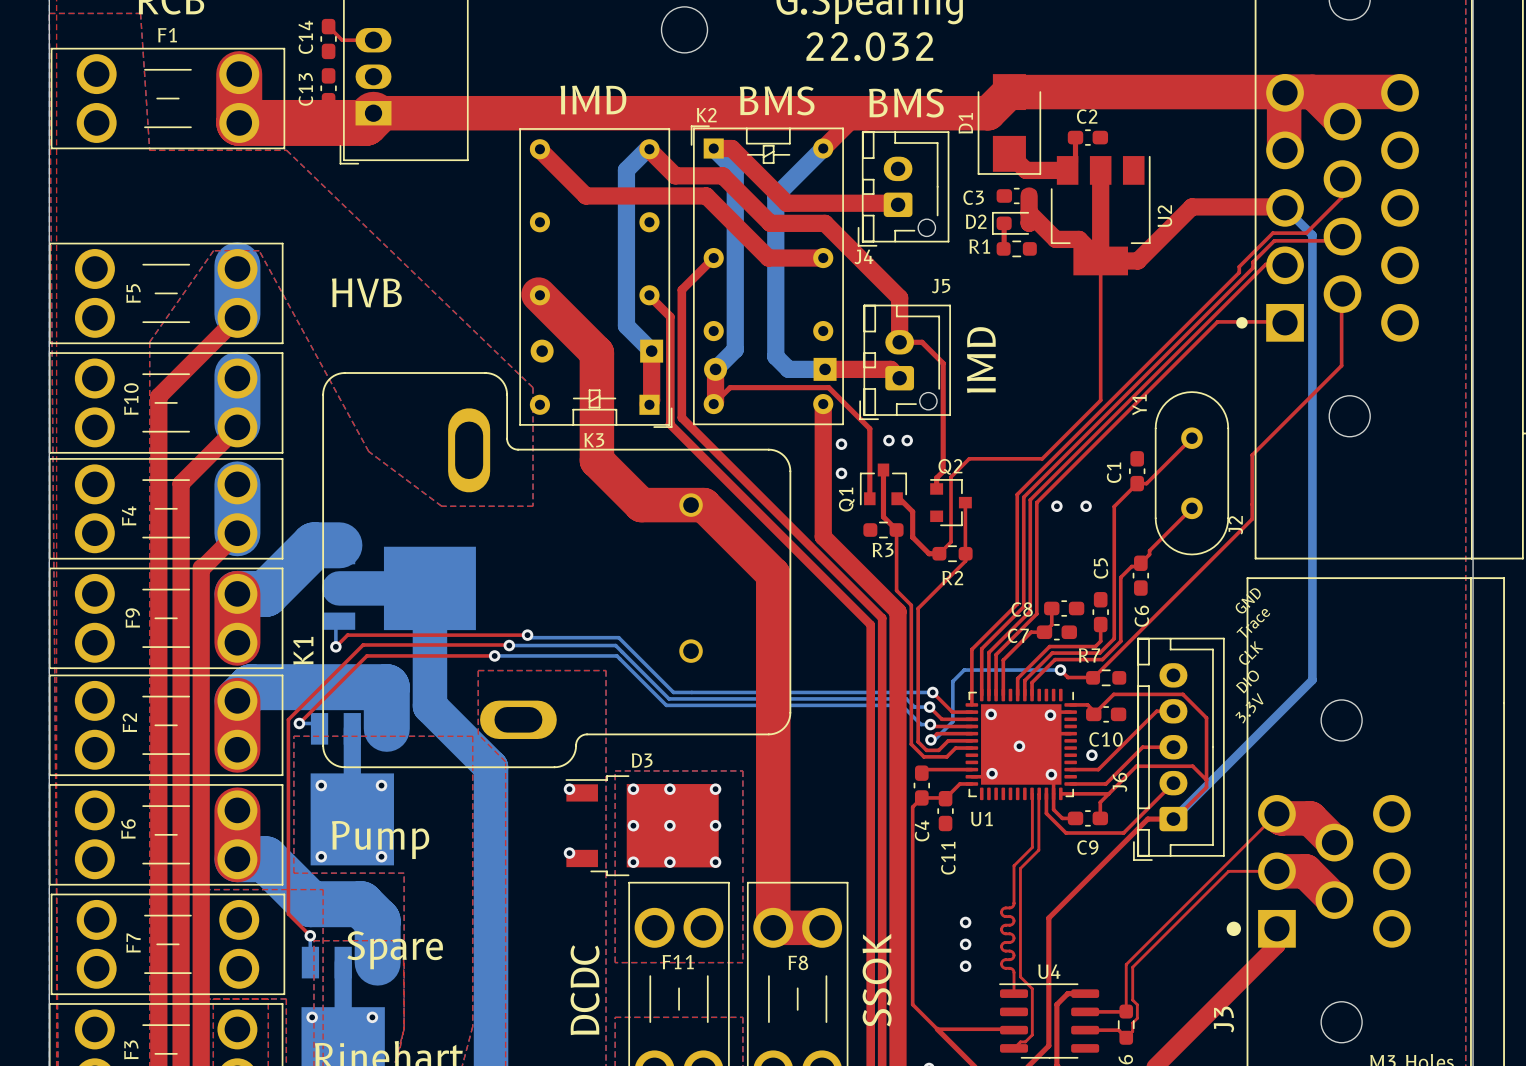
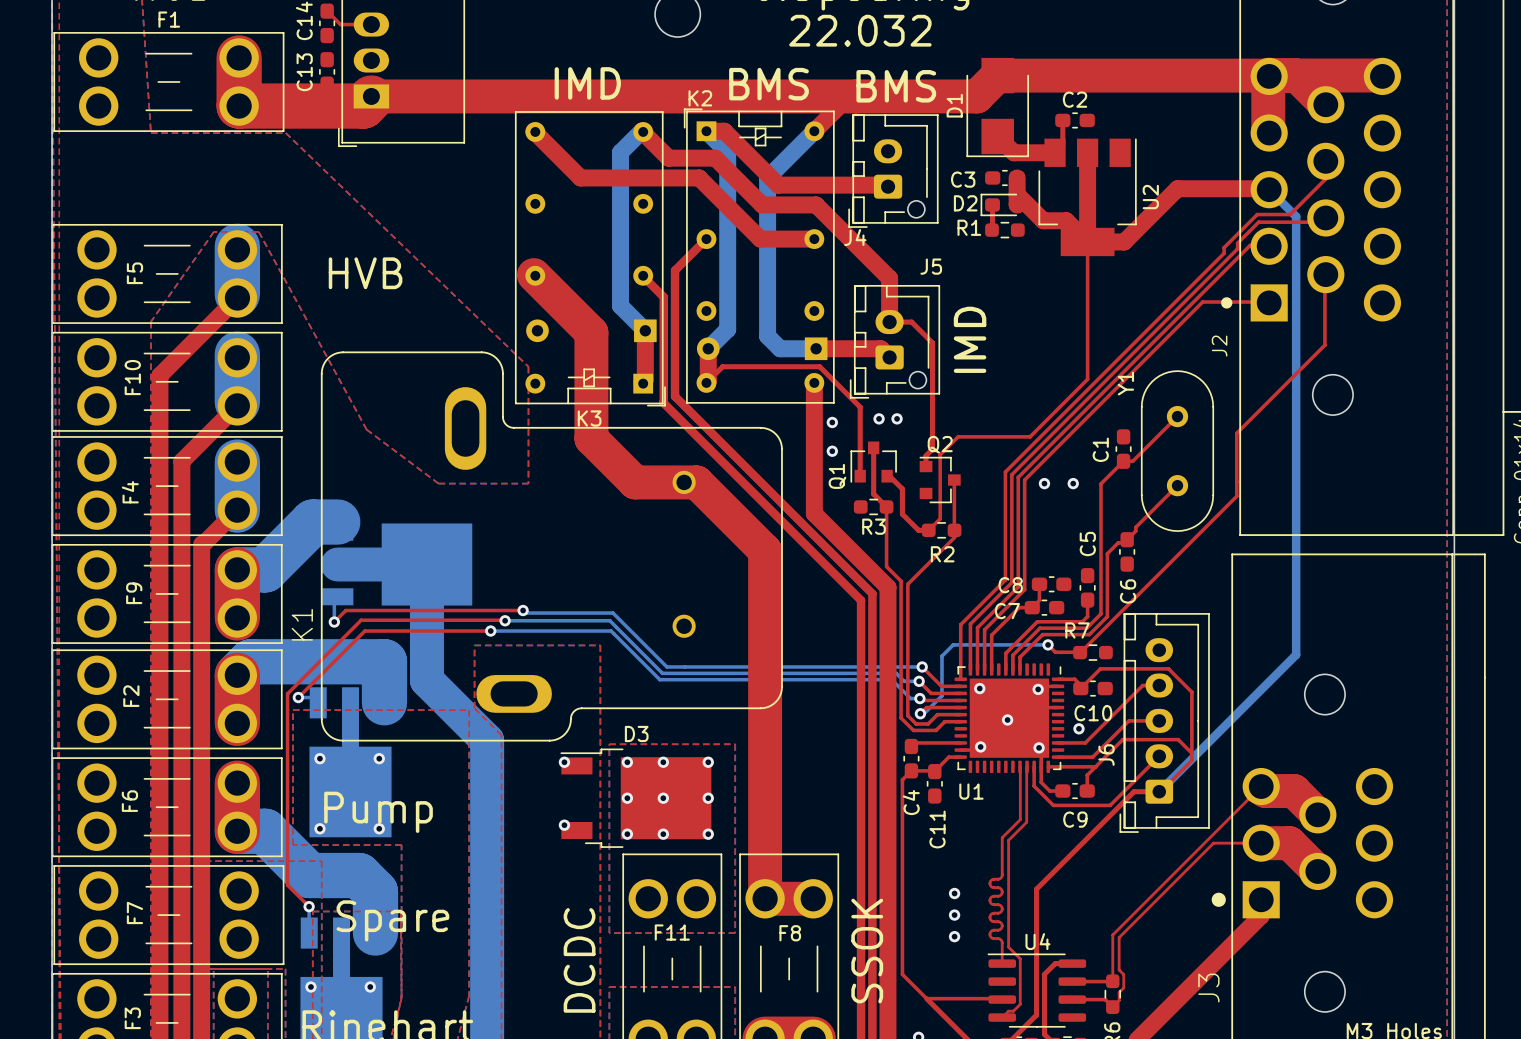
J2 name position: J2 (1235, 525) -> J2 (1219, 346)
text: GND (1248, 600) -> none
text: Trace (1253, 623) -> none
text: CLK (1251, 652) -> none
text: DIO (1247, 682) -> none
text: 3.3V (1249, 708) -> none

